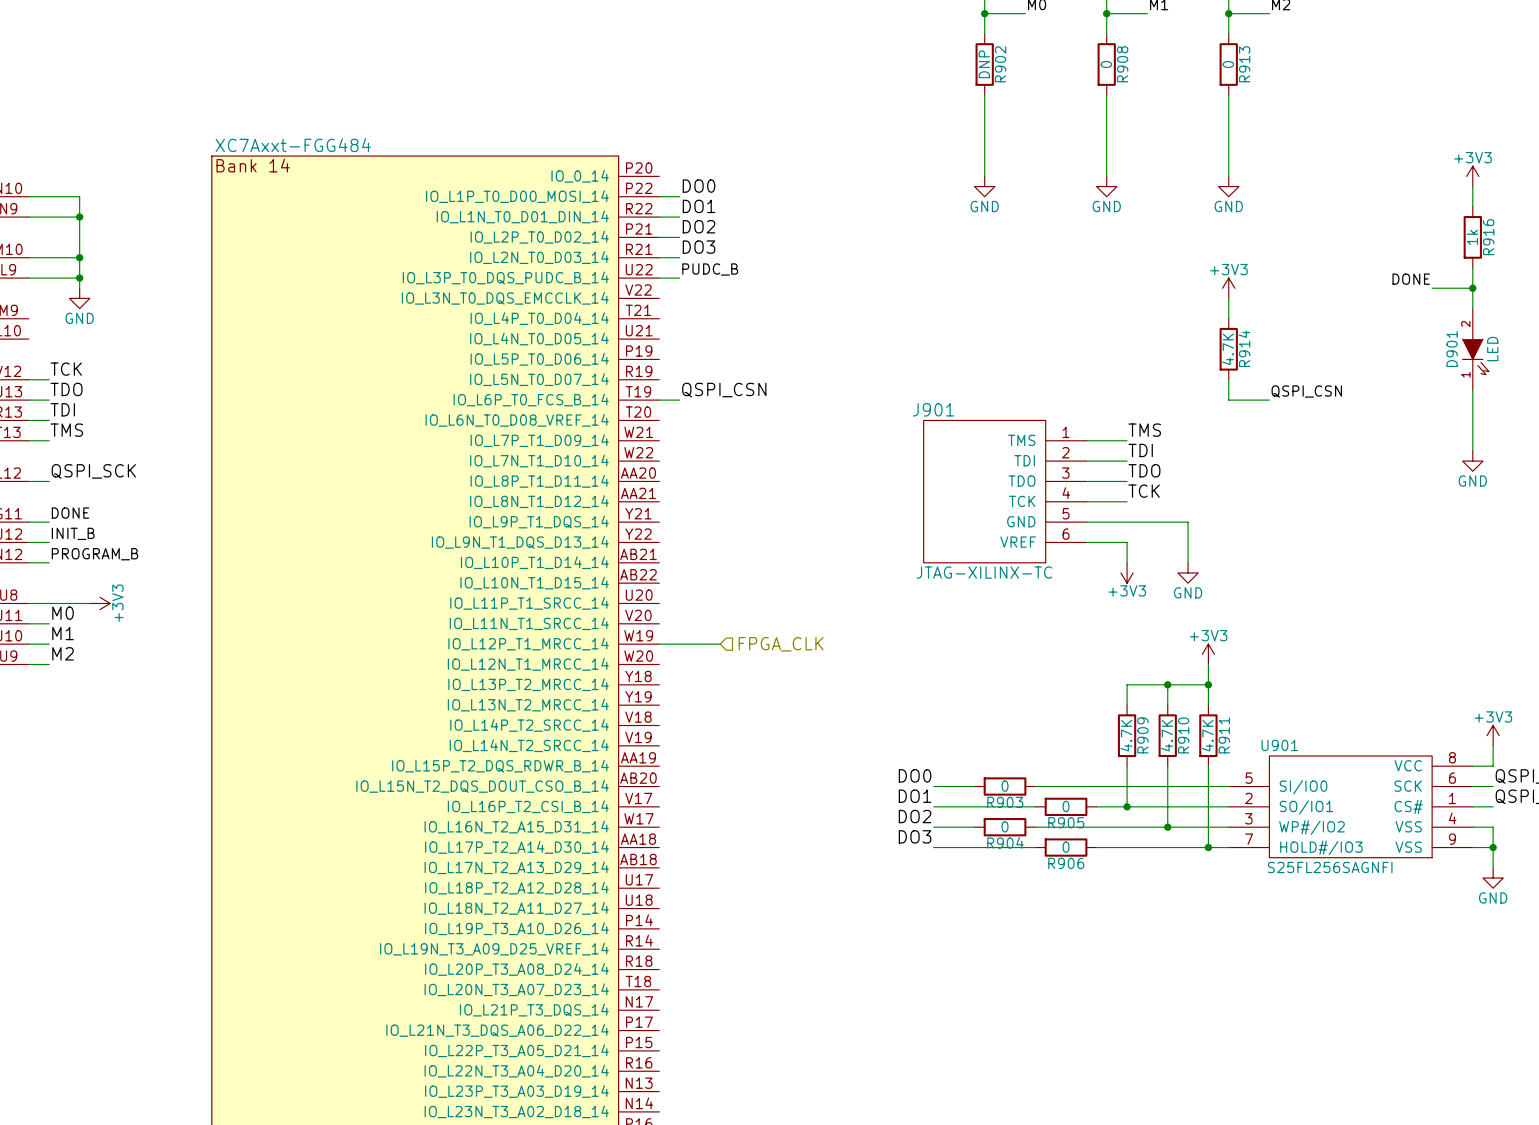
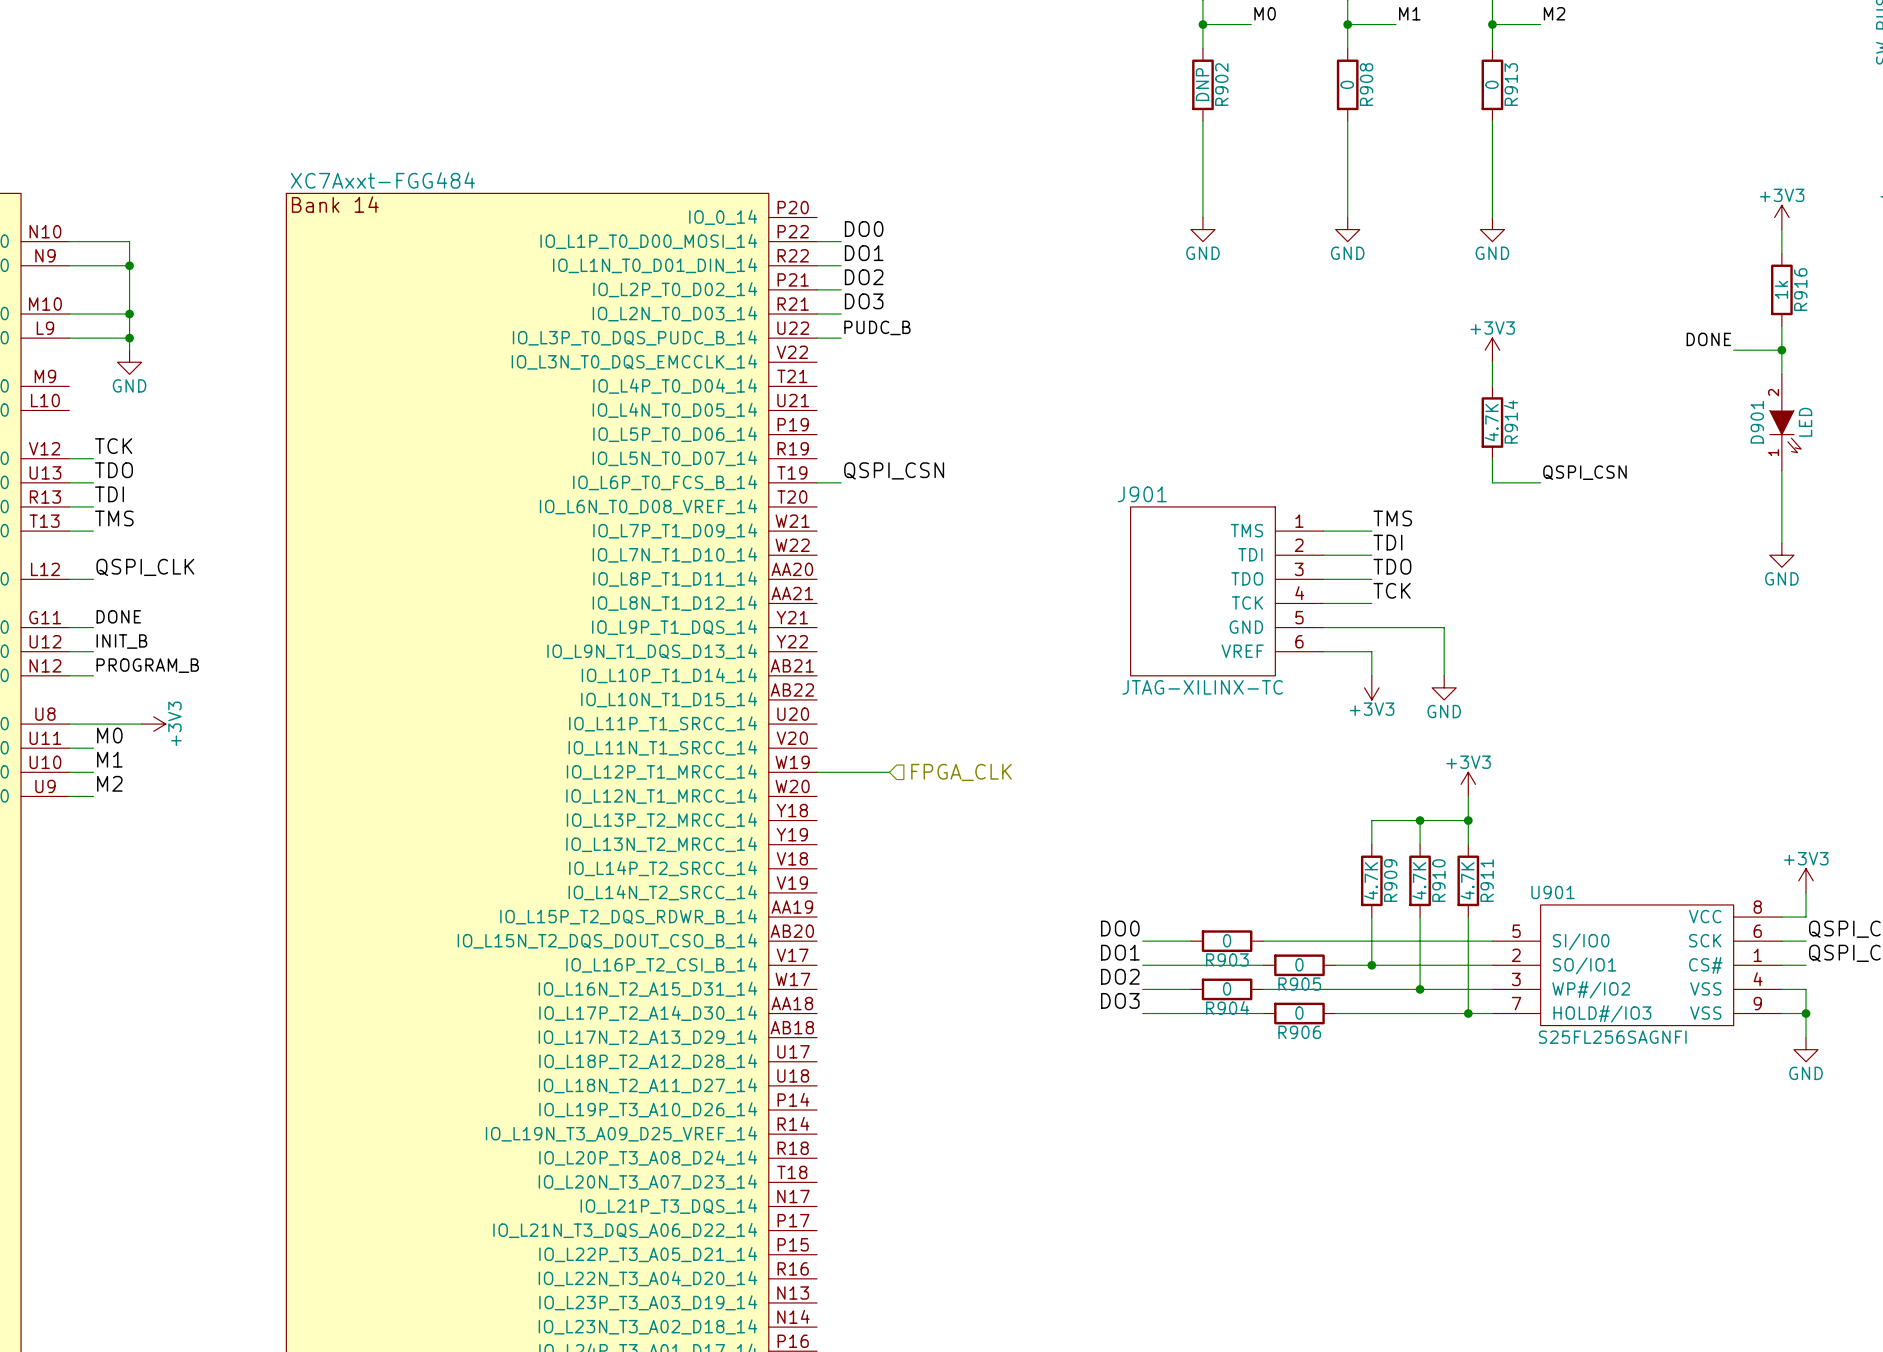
label: QSPI_SCK (93, 471) -> QSPI_CLK (145, 567)

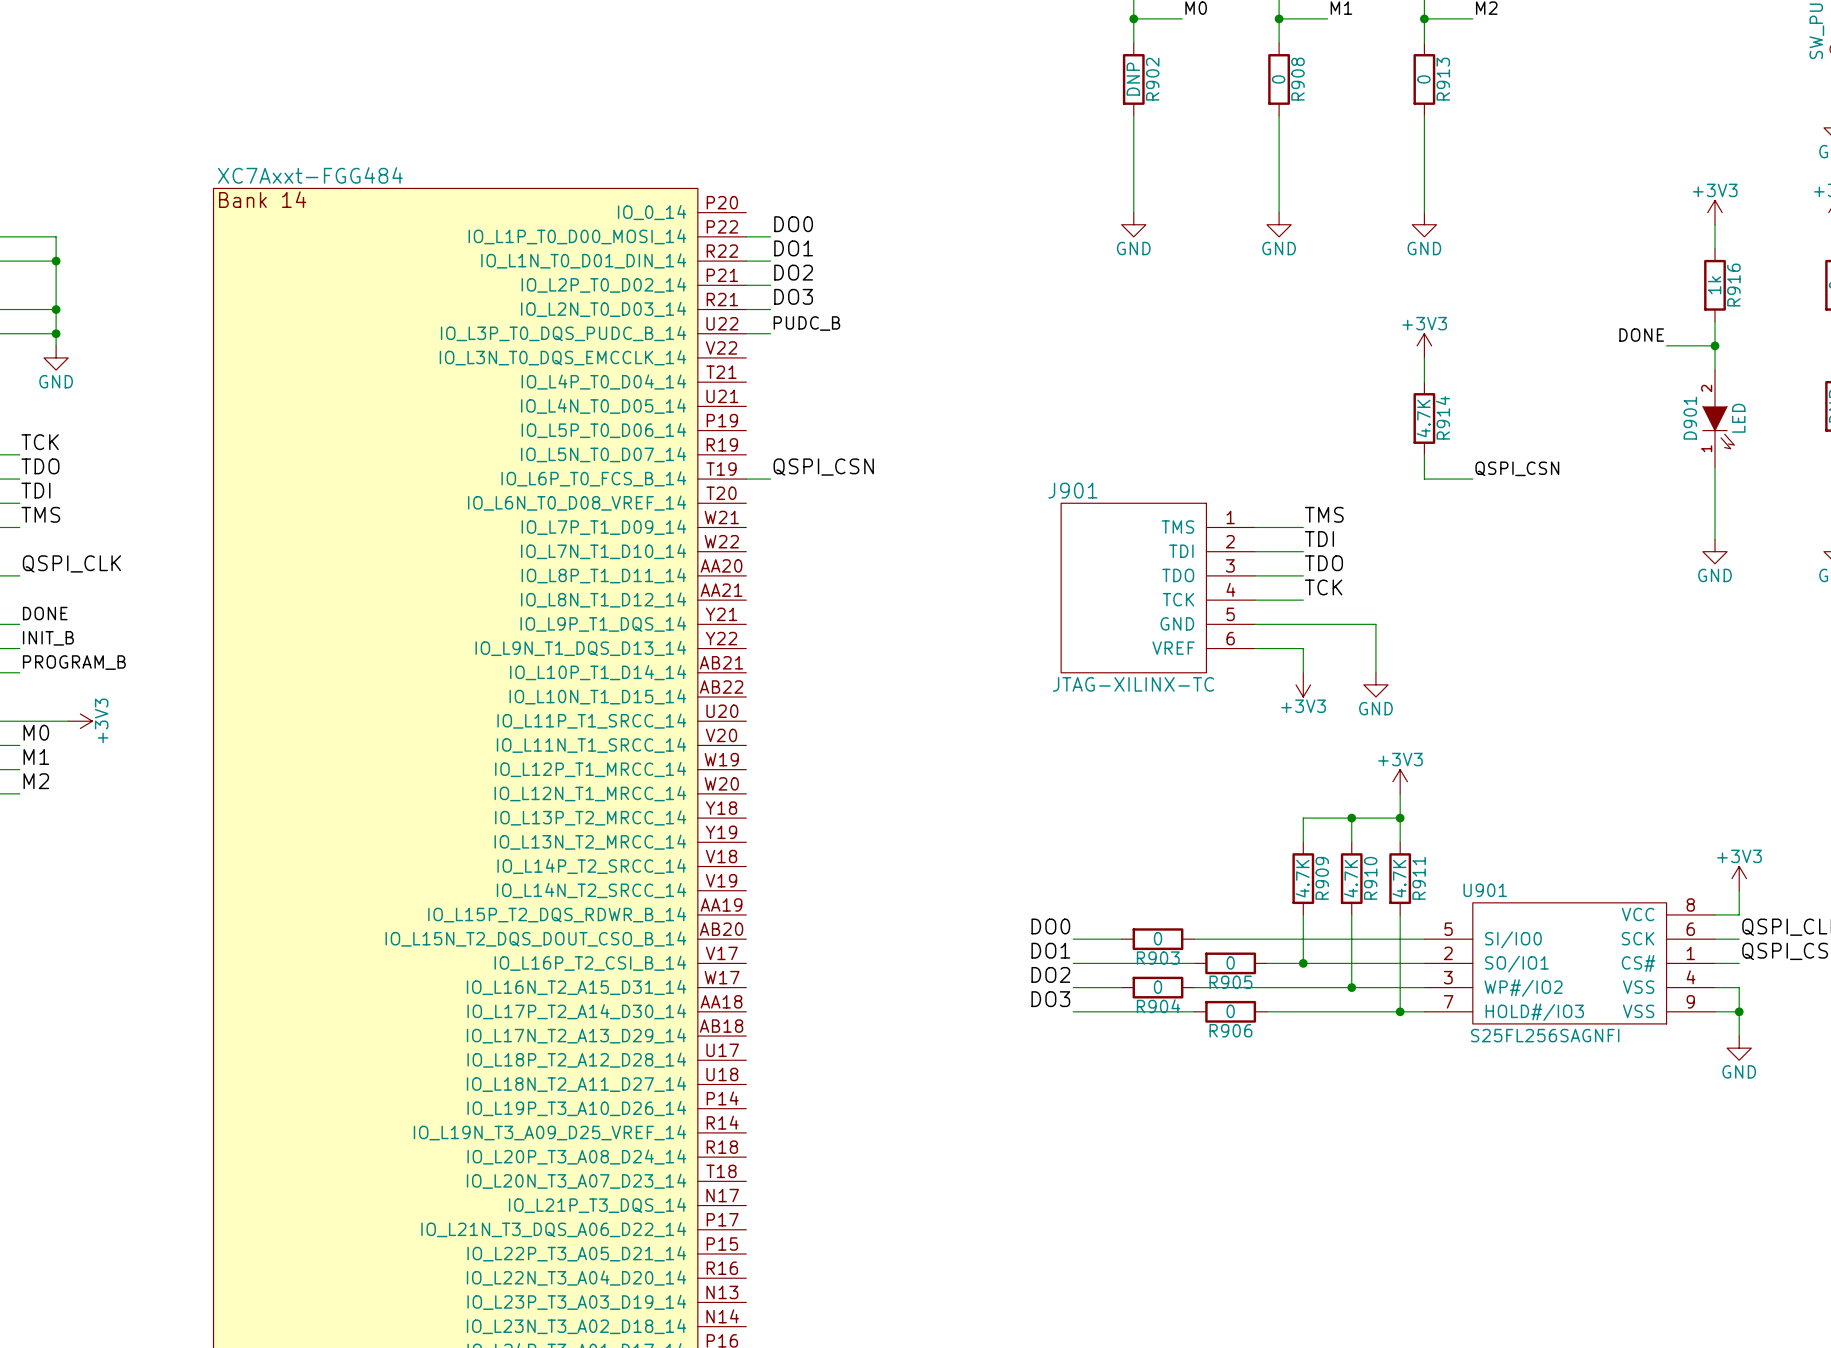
wire: (817, 772) (889, 772) -> none
hierarchical label: FPGA_CLK (961, 772) -> none

